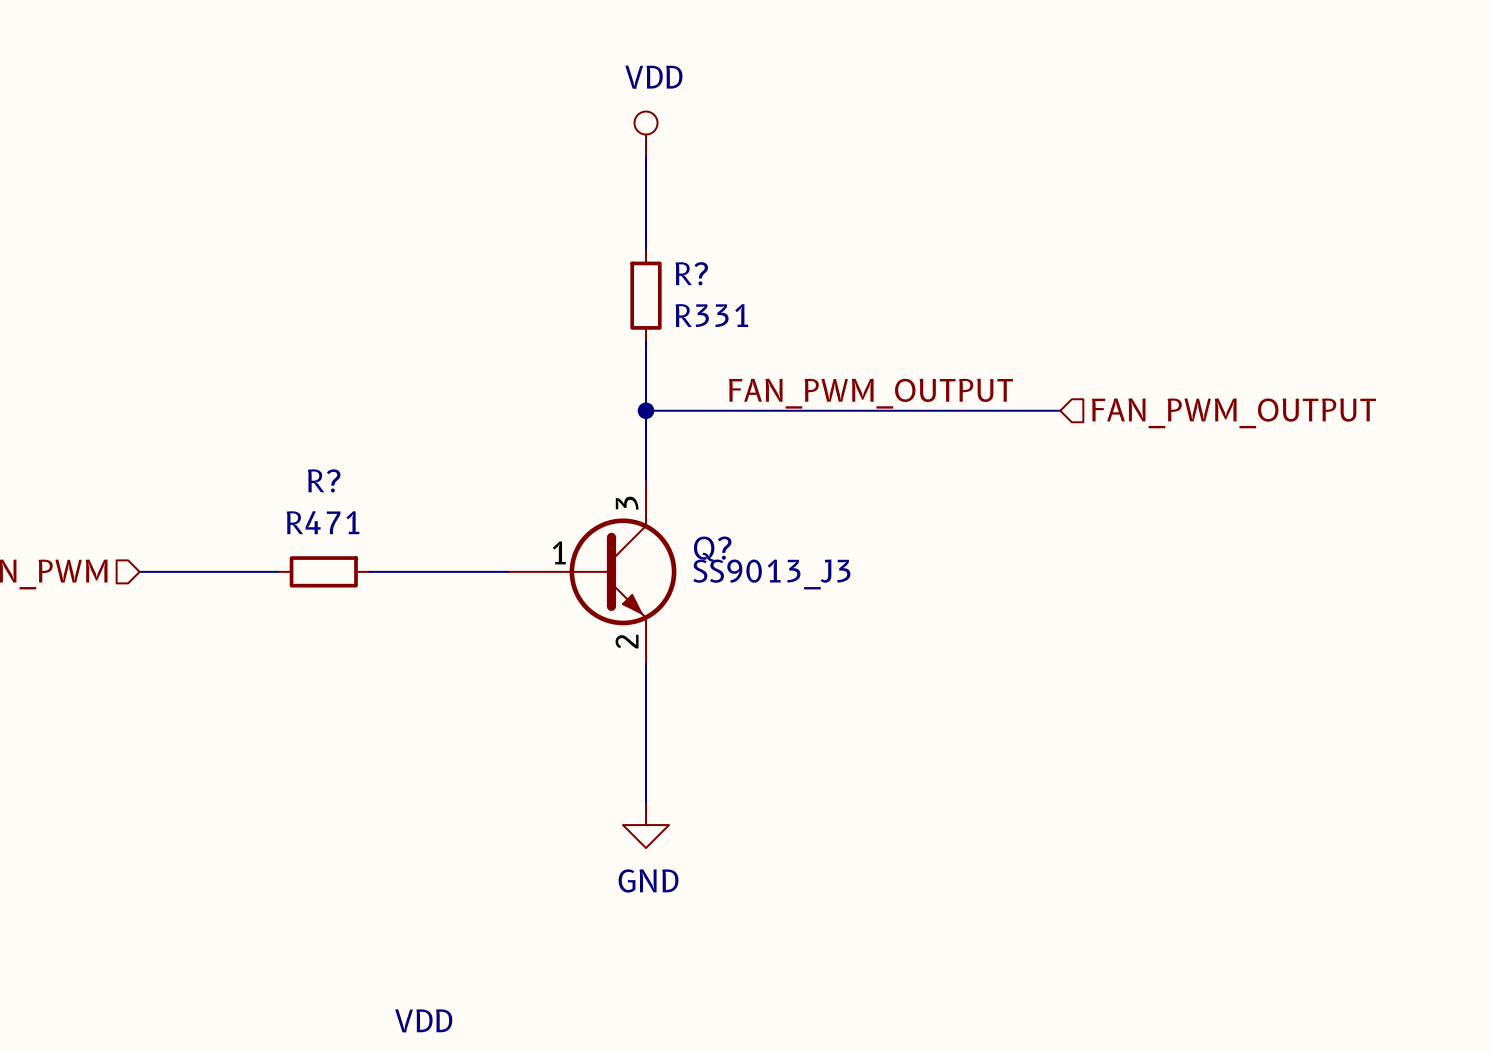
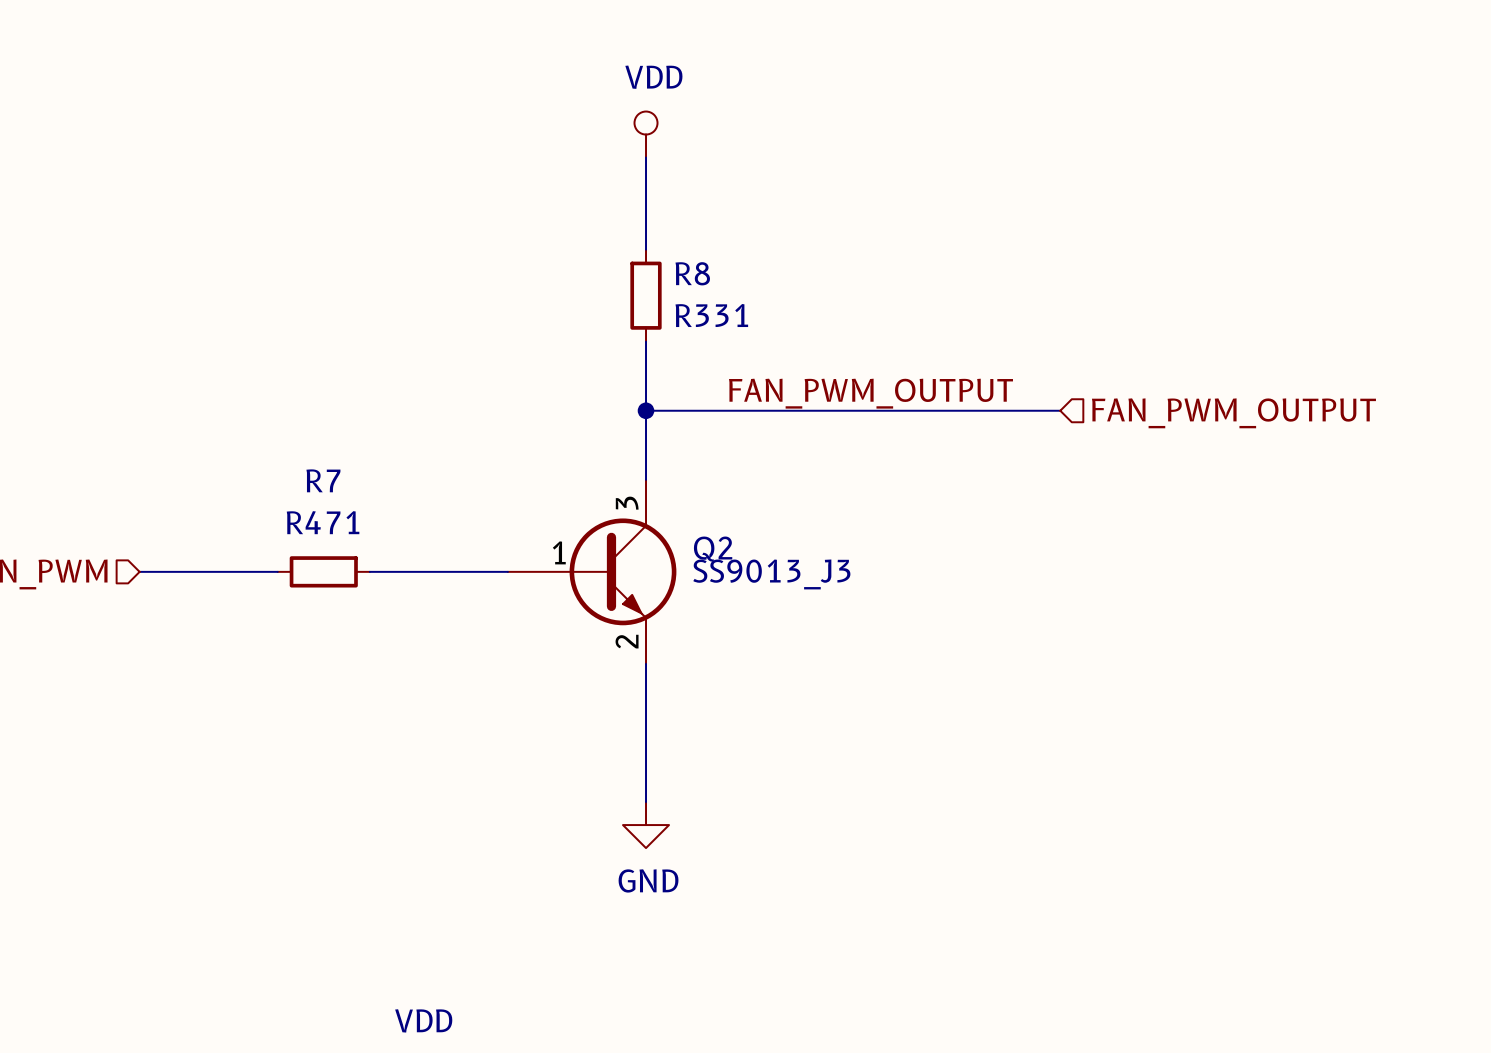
R? name: R? (691, 273) -> R8 (692, 273)
R? name: R? (324, 480) -> R7 (323, 480)
Q? name: Q? (712, 549) -> Q2 (713, 549)

